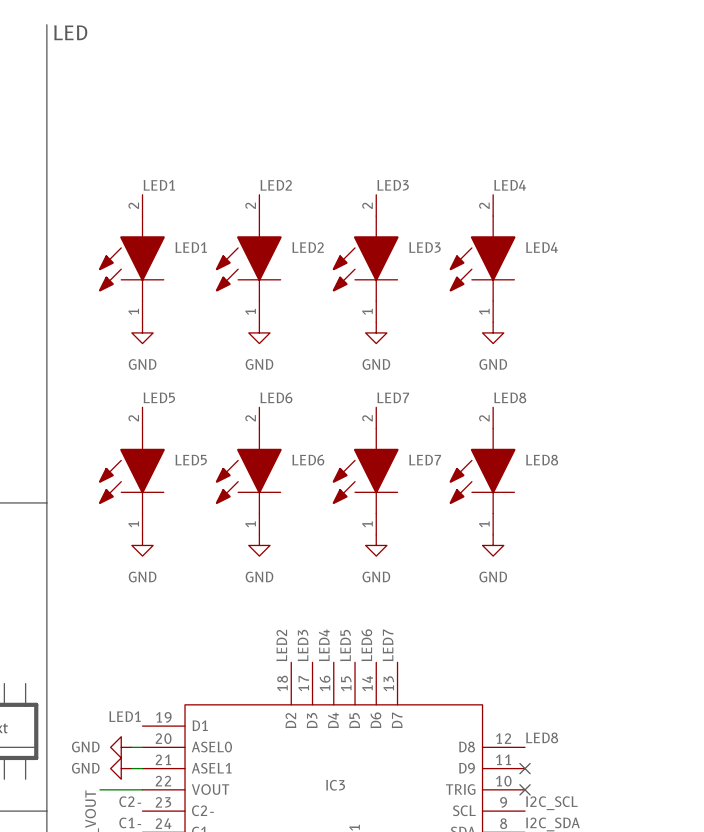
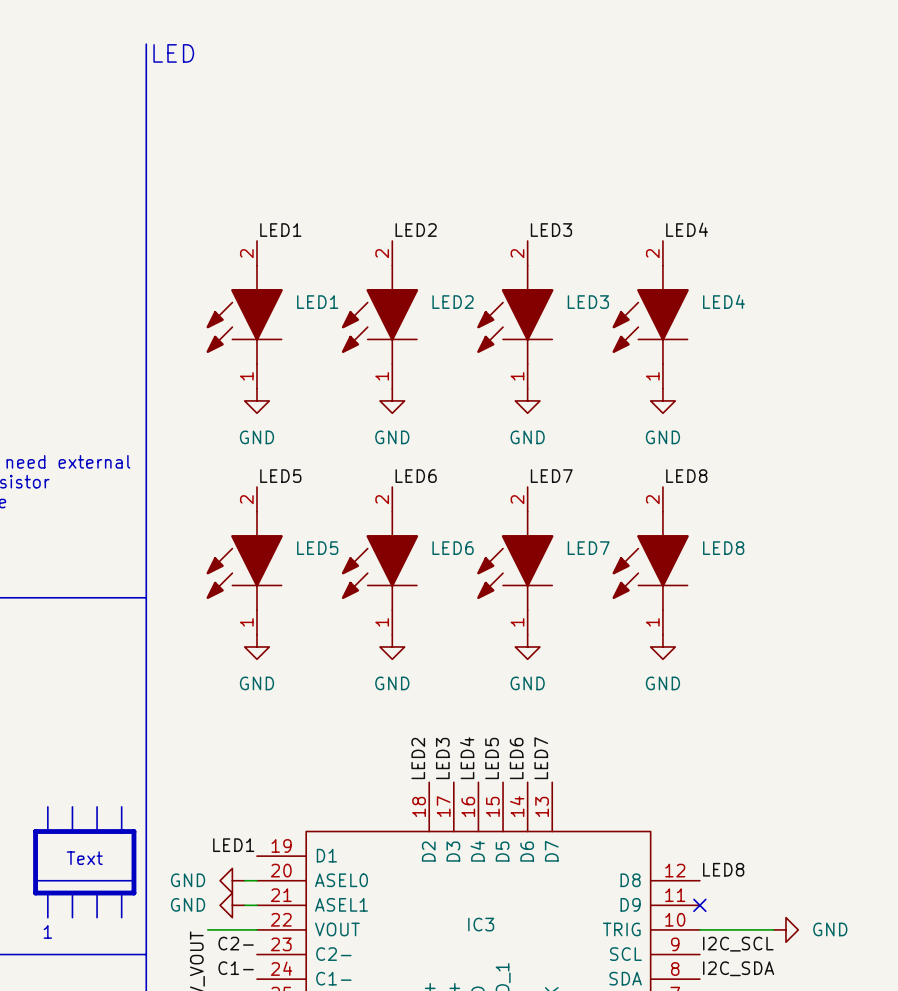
wire: none -> (699, 929) (773, 929)
no-connect mark: (525, 789) -> none
power symbol: none -> GND (785, 929)

